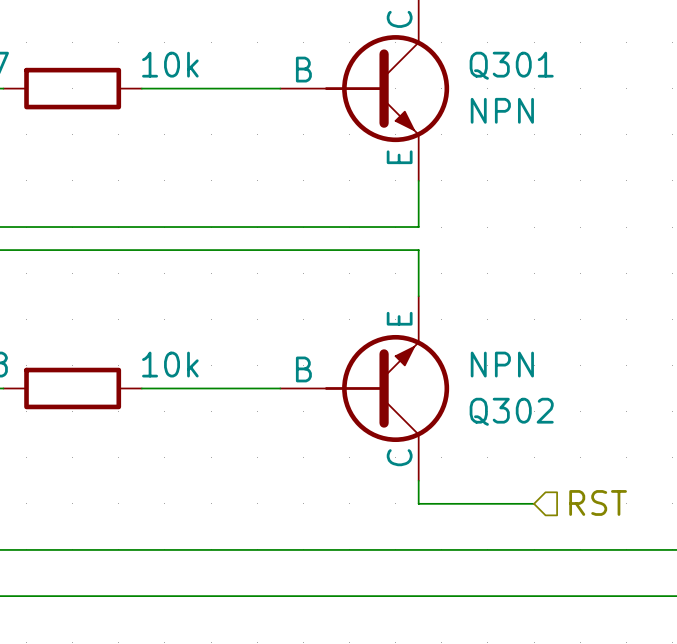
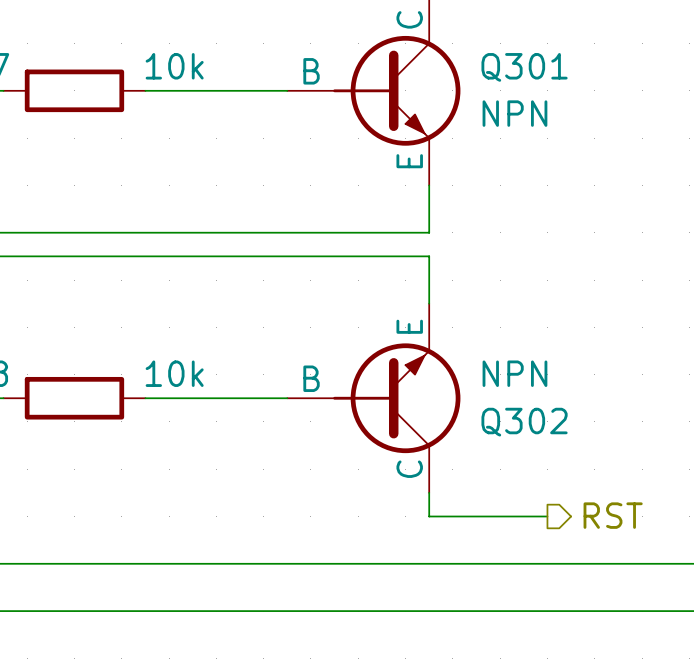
hierarchical label shape: input (598, 502) -> output (613, 515)

